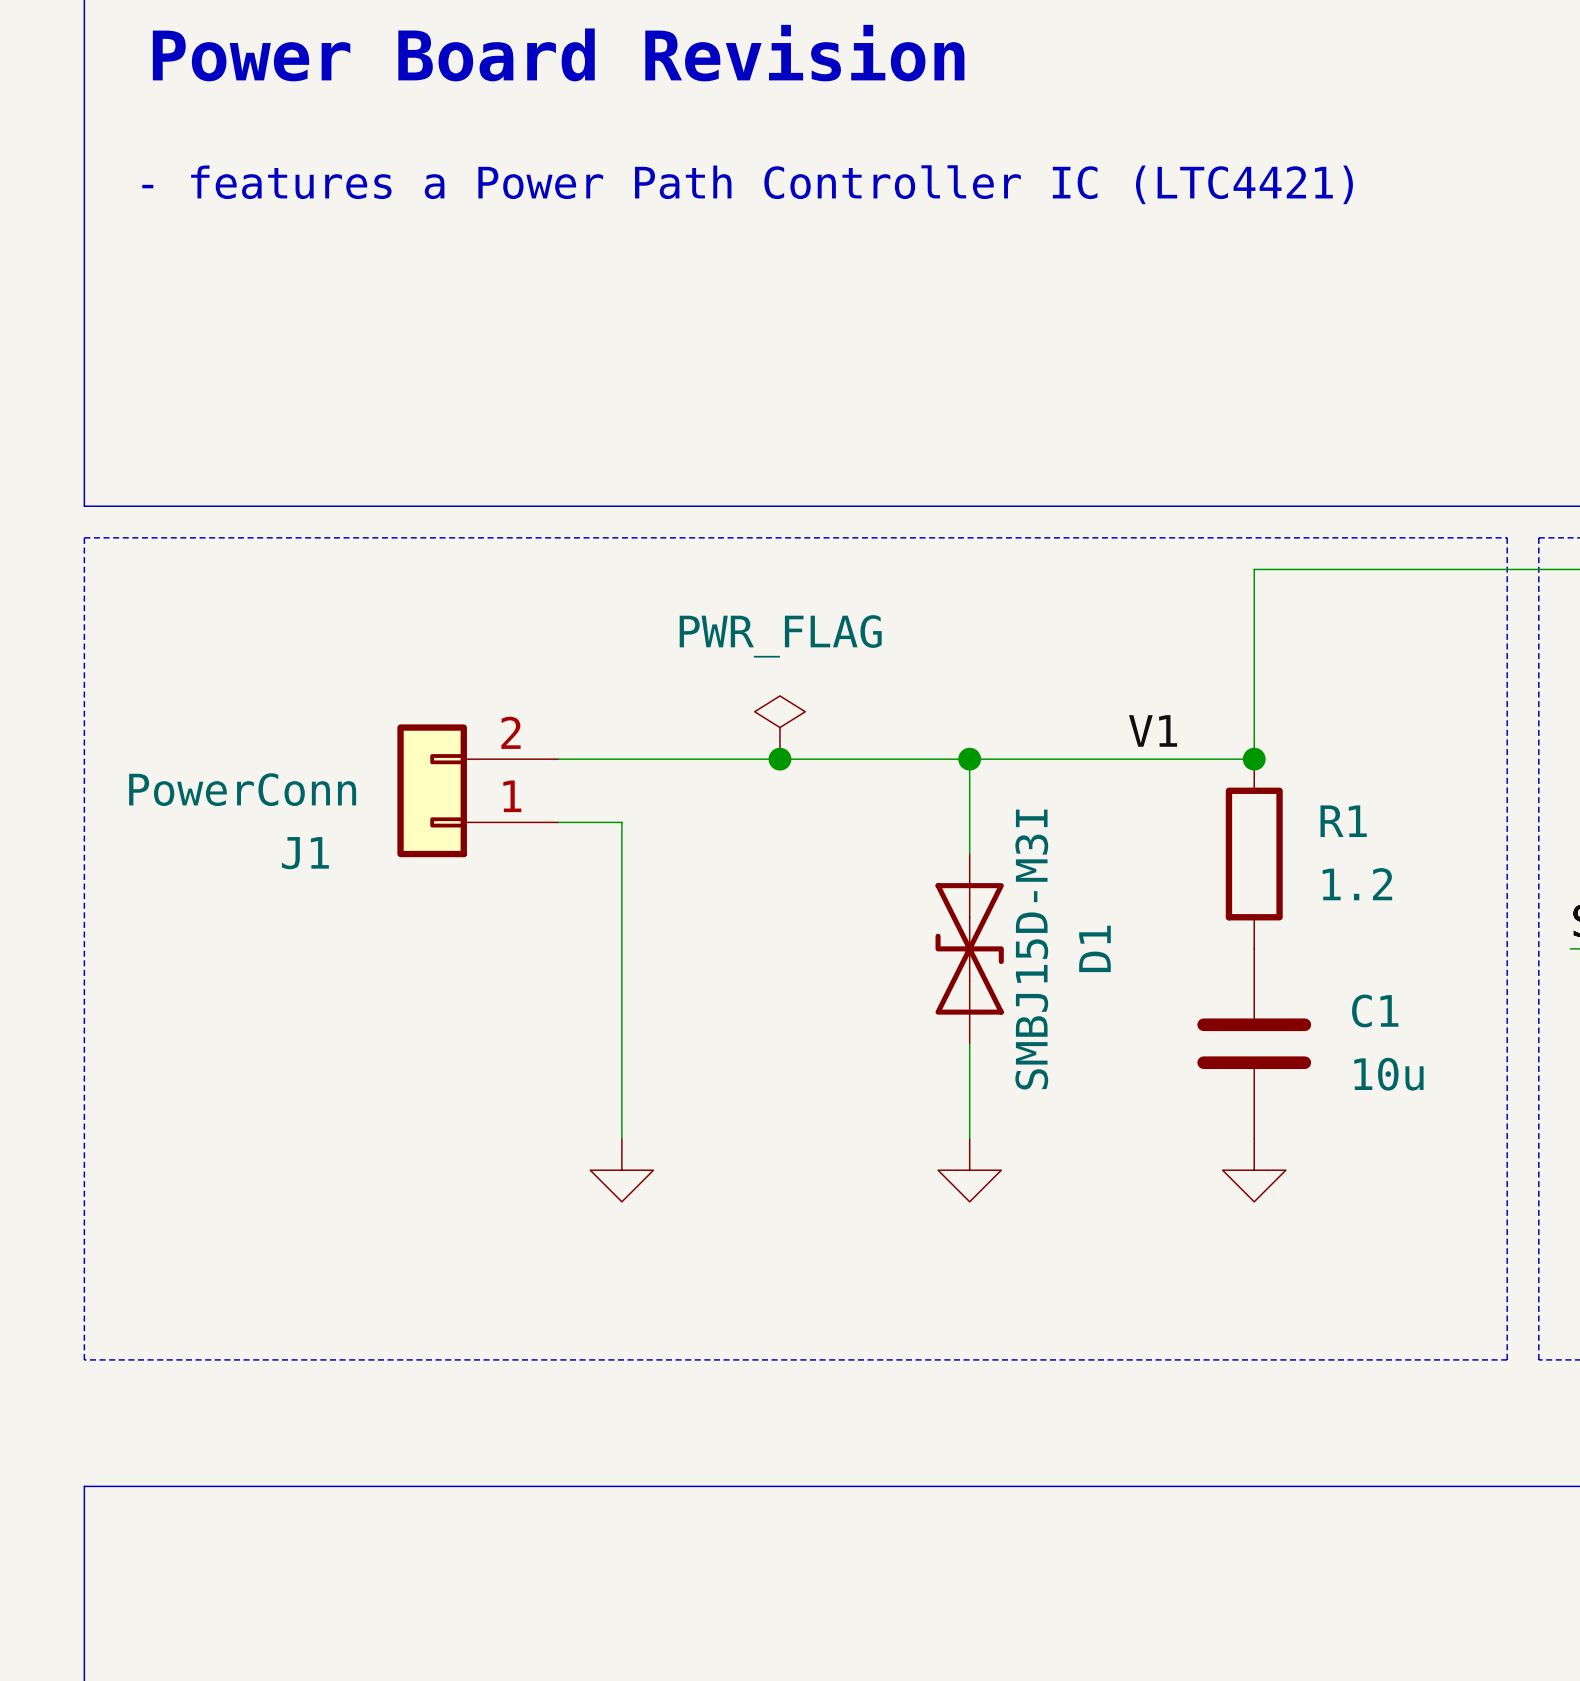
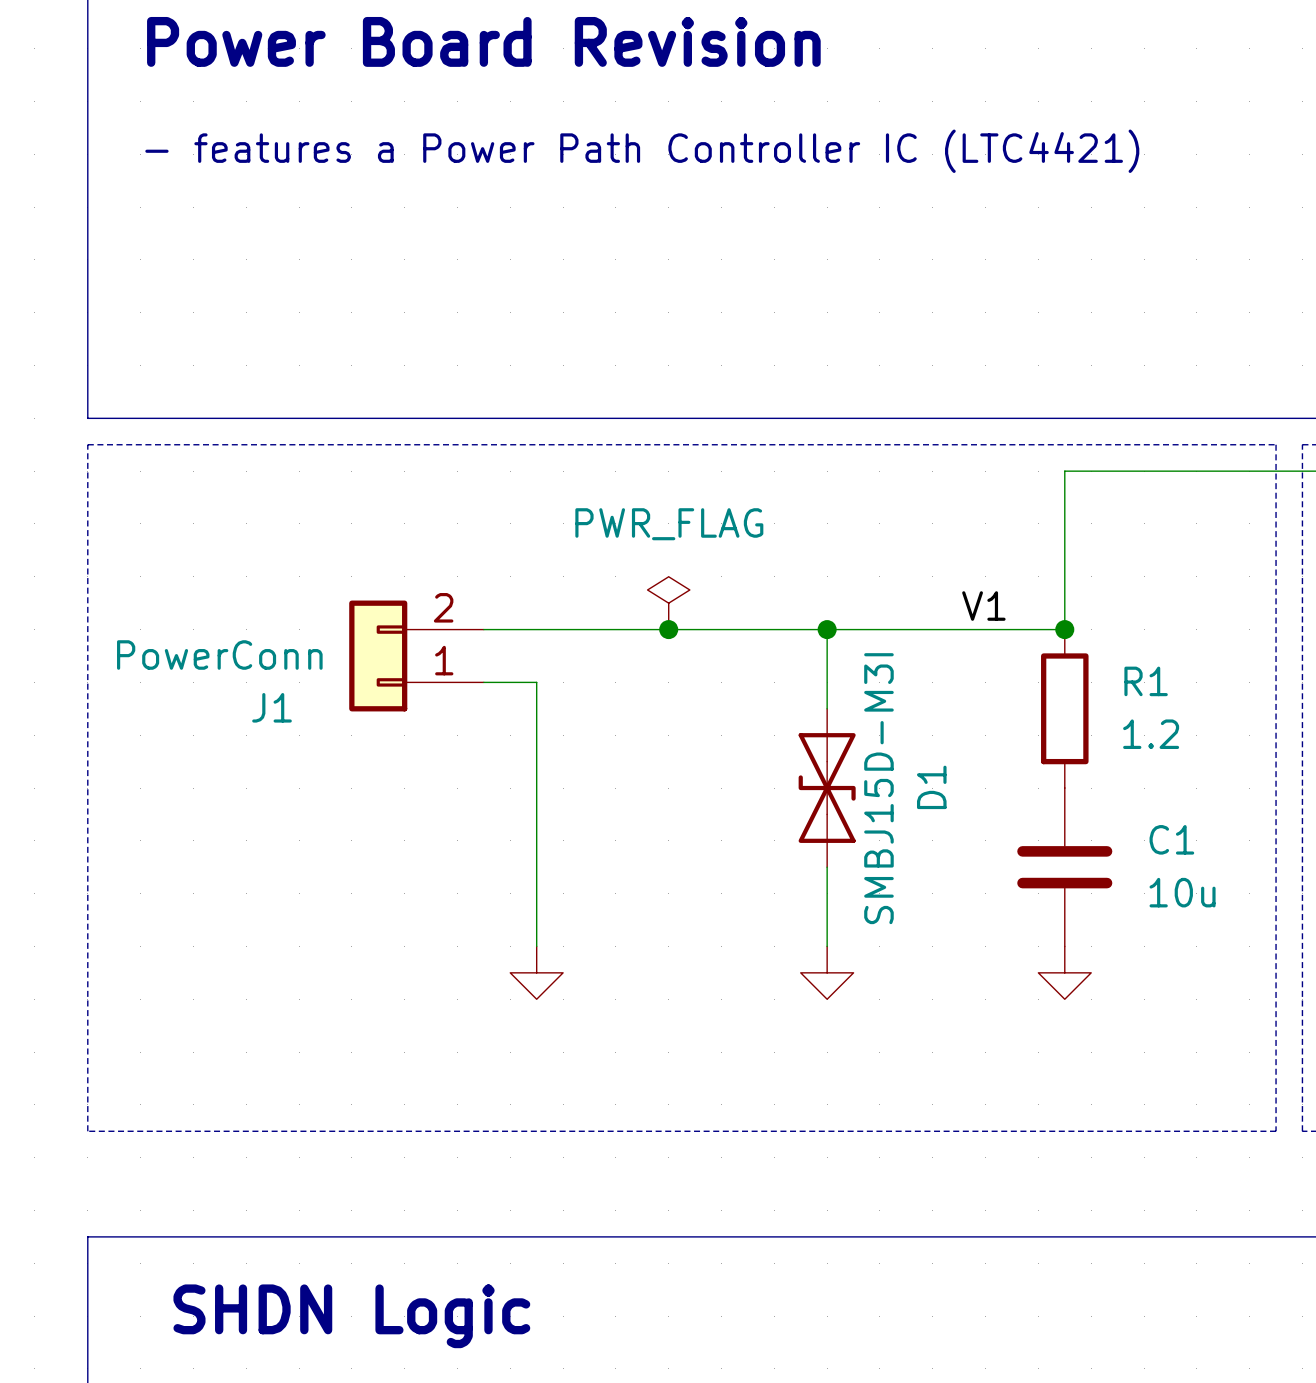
text: none -> SHDN Logic (351, 1316)

